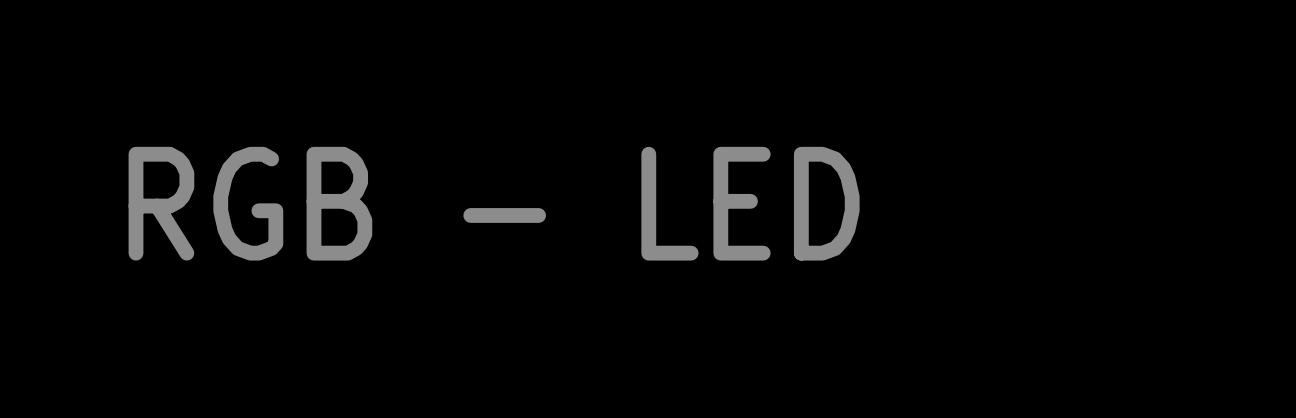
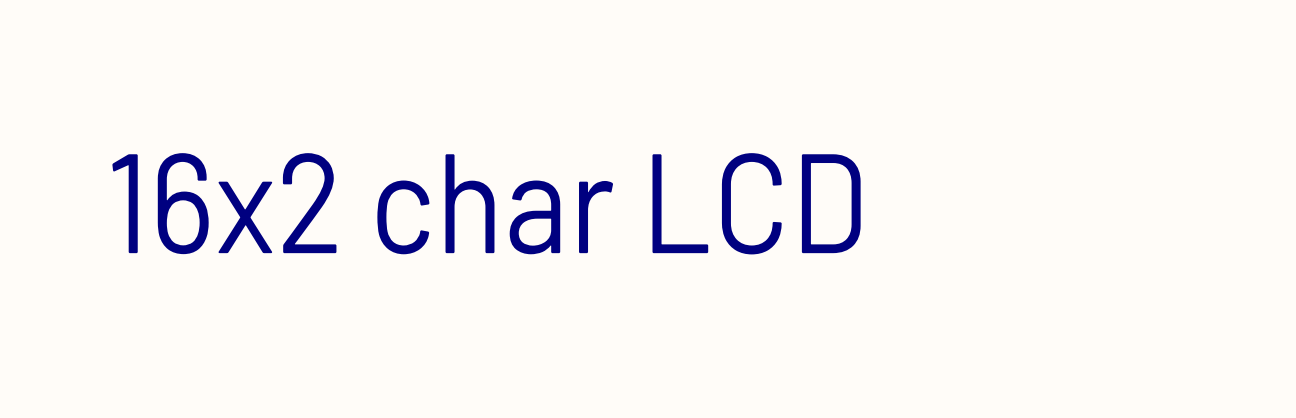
text: RGB - LED (494, 203) -> 16x2 char LCD (486, 203)

